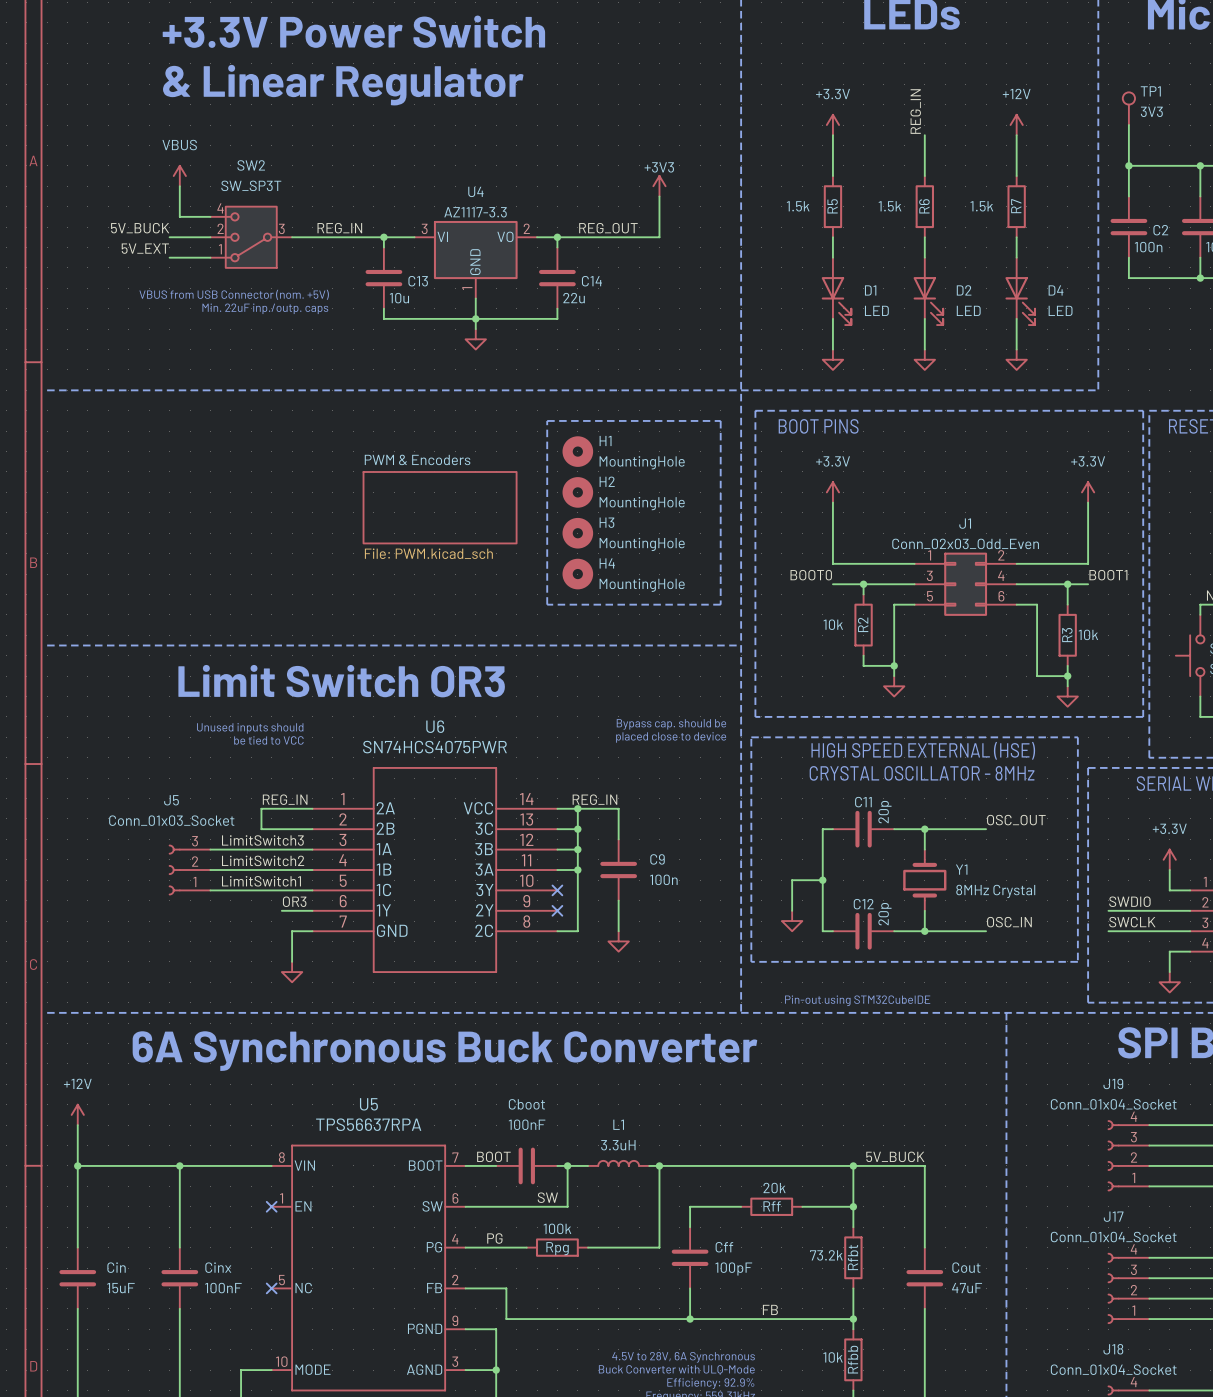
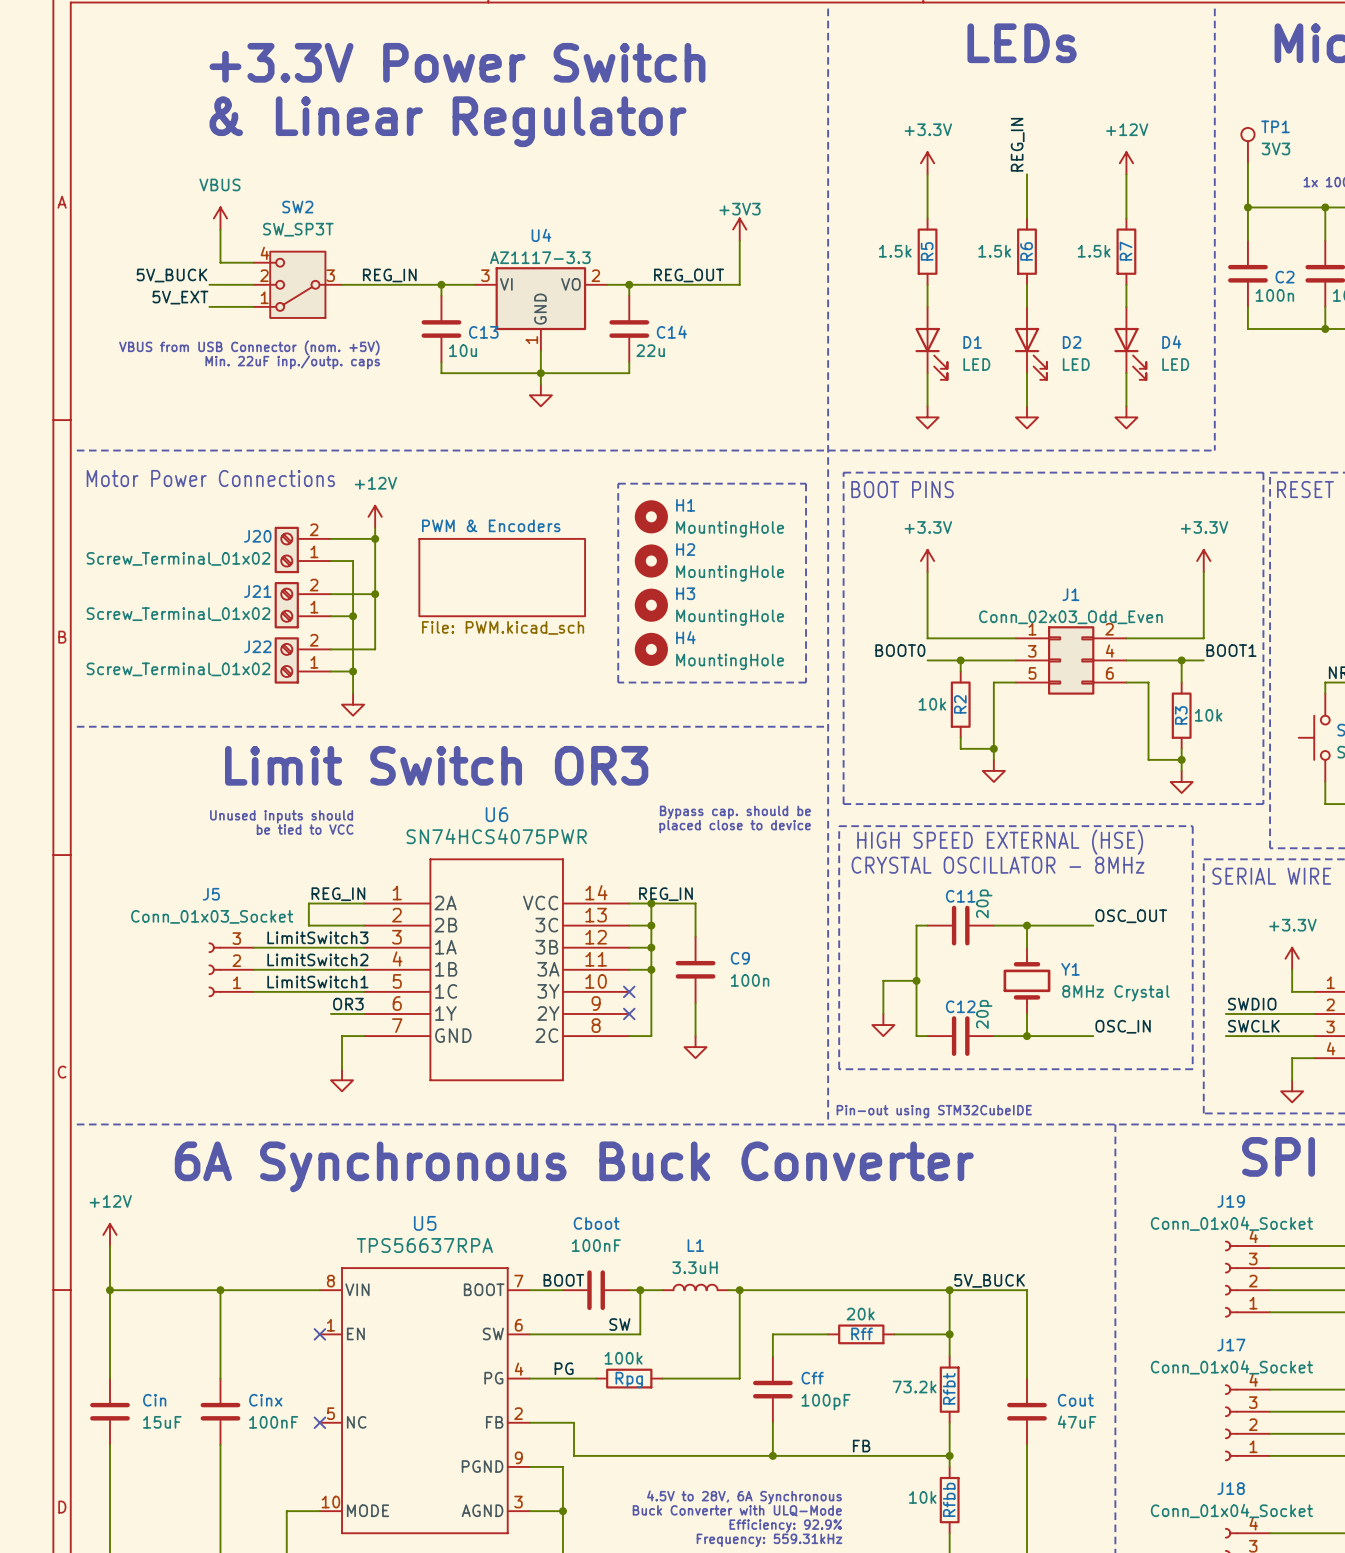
text: none -> Motor Power Connections (210, 478)
power symbol: none -> +12V (375, 516)
wire: none -> (375, 527) (375, 649) (330, 649)
wire: none -> (330, 538) (375, 538)
junction: none -> (375, 538)
J20: none -> Screw_Terminal_01x02 (302, 549)
wire: none -> (330, 561) (353, 561) (353, 693)
wire: none -> (330, 594) (375, 594)
junction: none -> (375, 594)
J21: none -> Screw_Terminal_01x02 (302, 605)
wire: none -> (330, 616) (353, 616)
junction: none -> (353, 616)
J22: none -> Screw_Terminal_01x02 (302, 660)
wire: none -> (330, 671) (353, 671)
junction: none -> (353, 671)
power symbol: none -> (353, 704)

